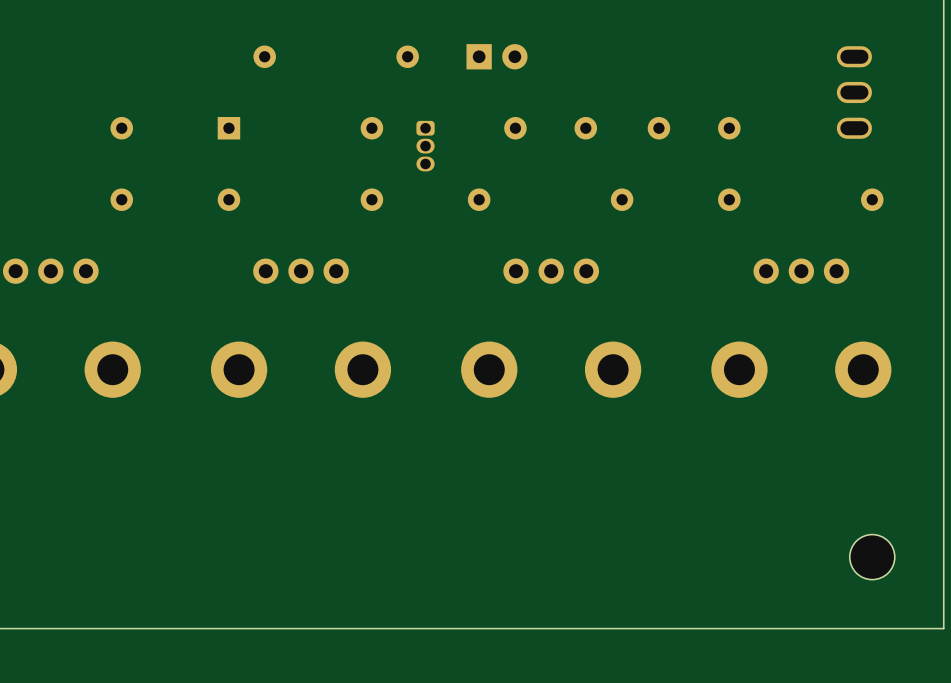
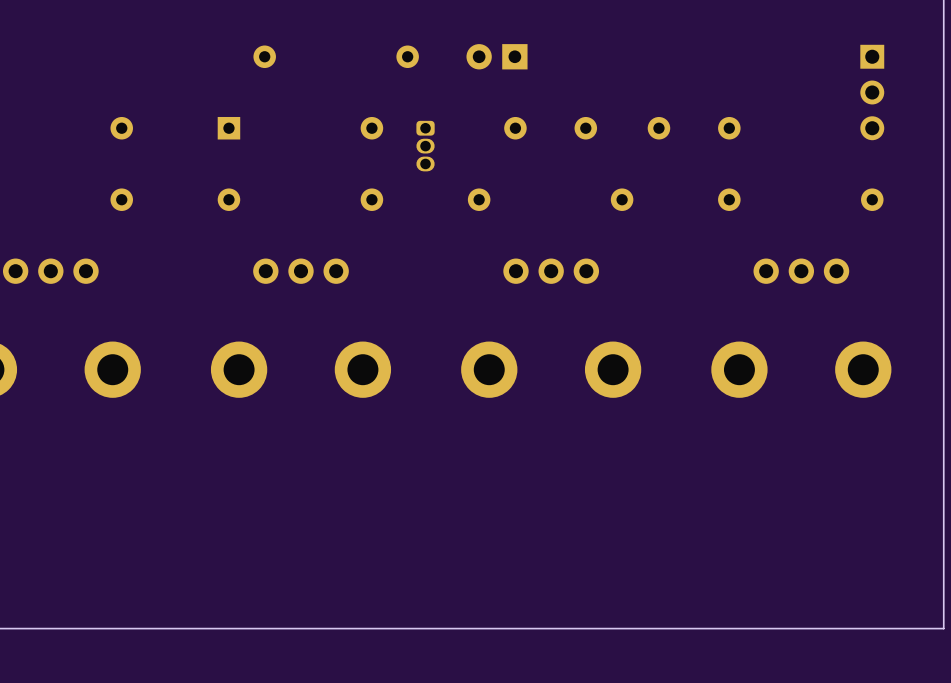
part rotation: 0° (497, 56) -> 180° (497, 56)
part: (854, 92) -> none
part: none -> (872, 92)
part: (872, 557) -> none

